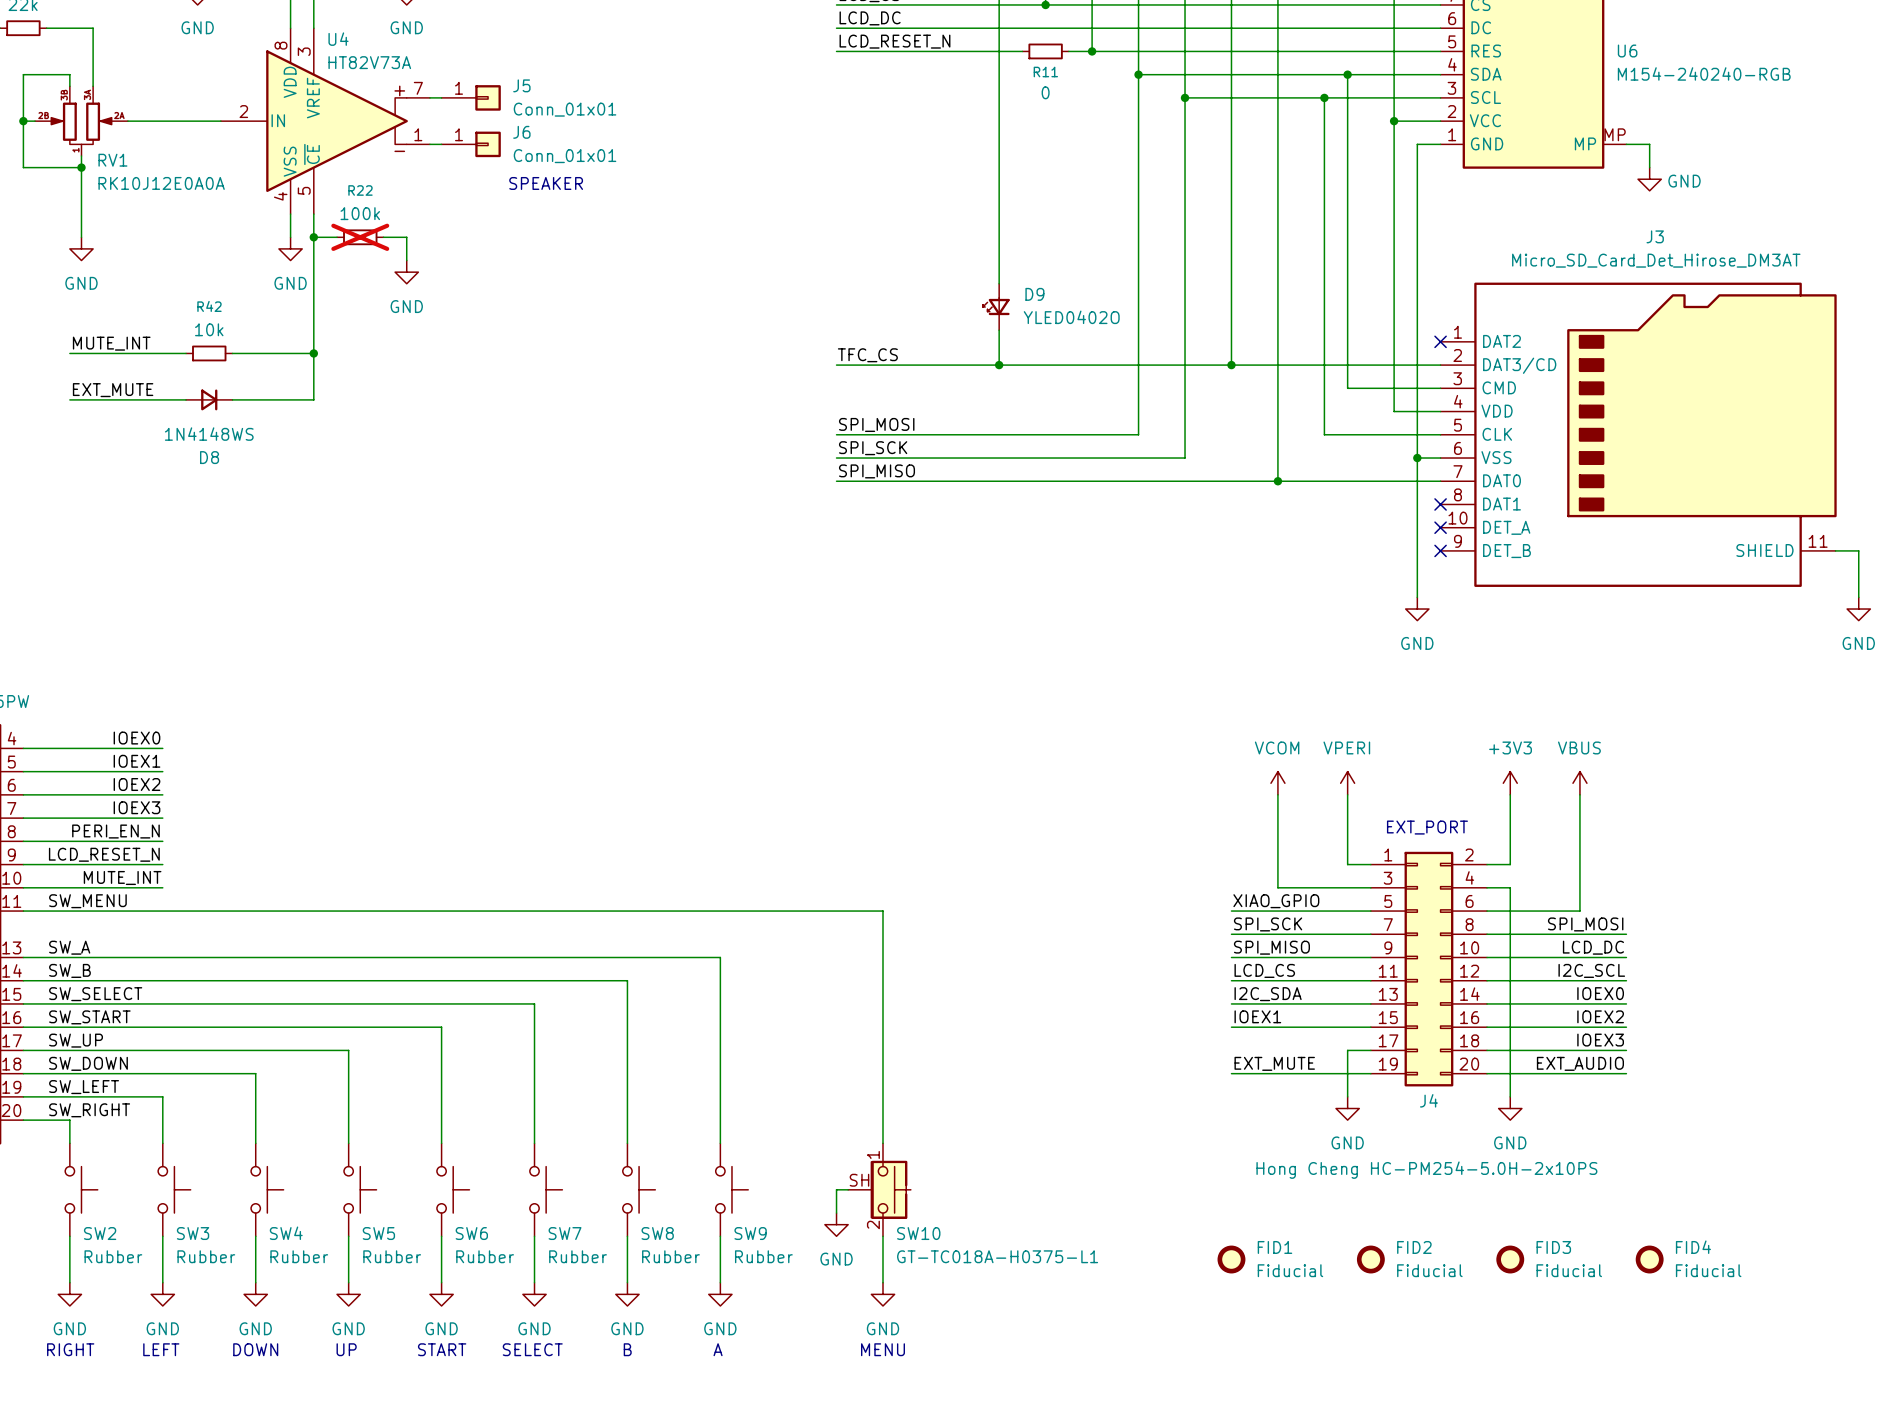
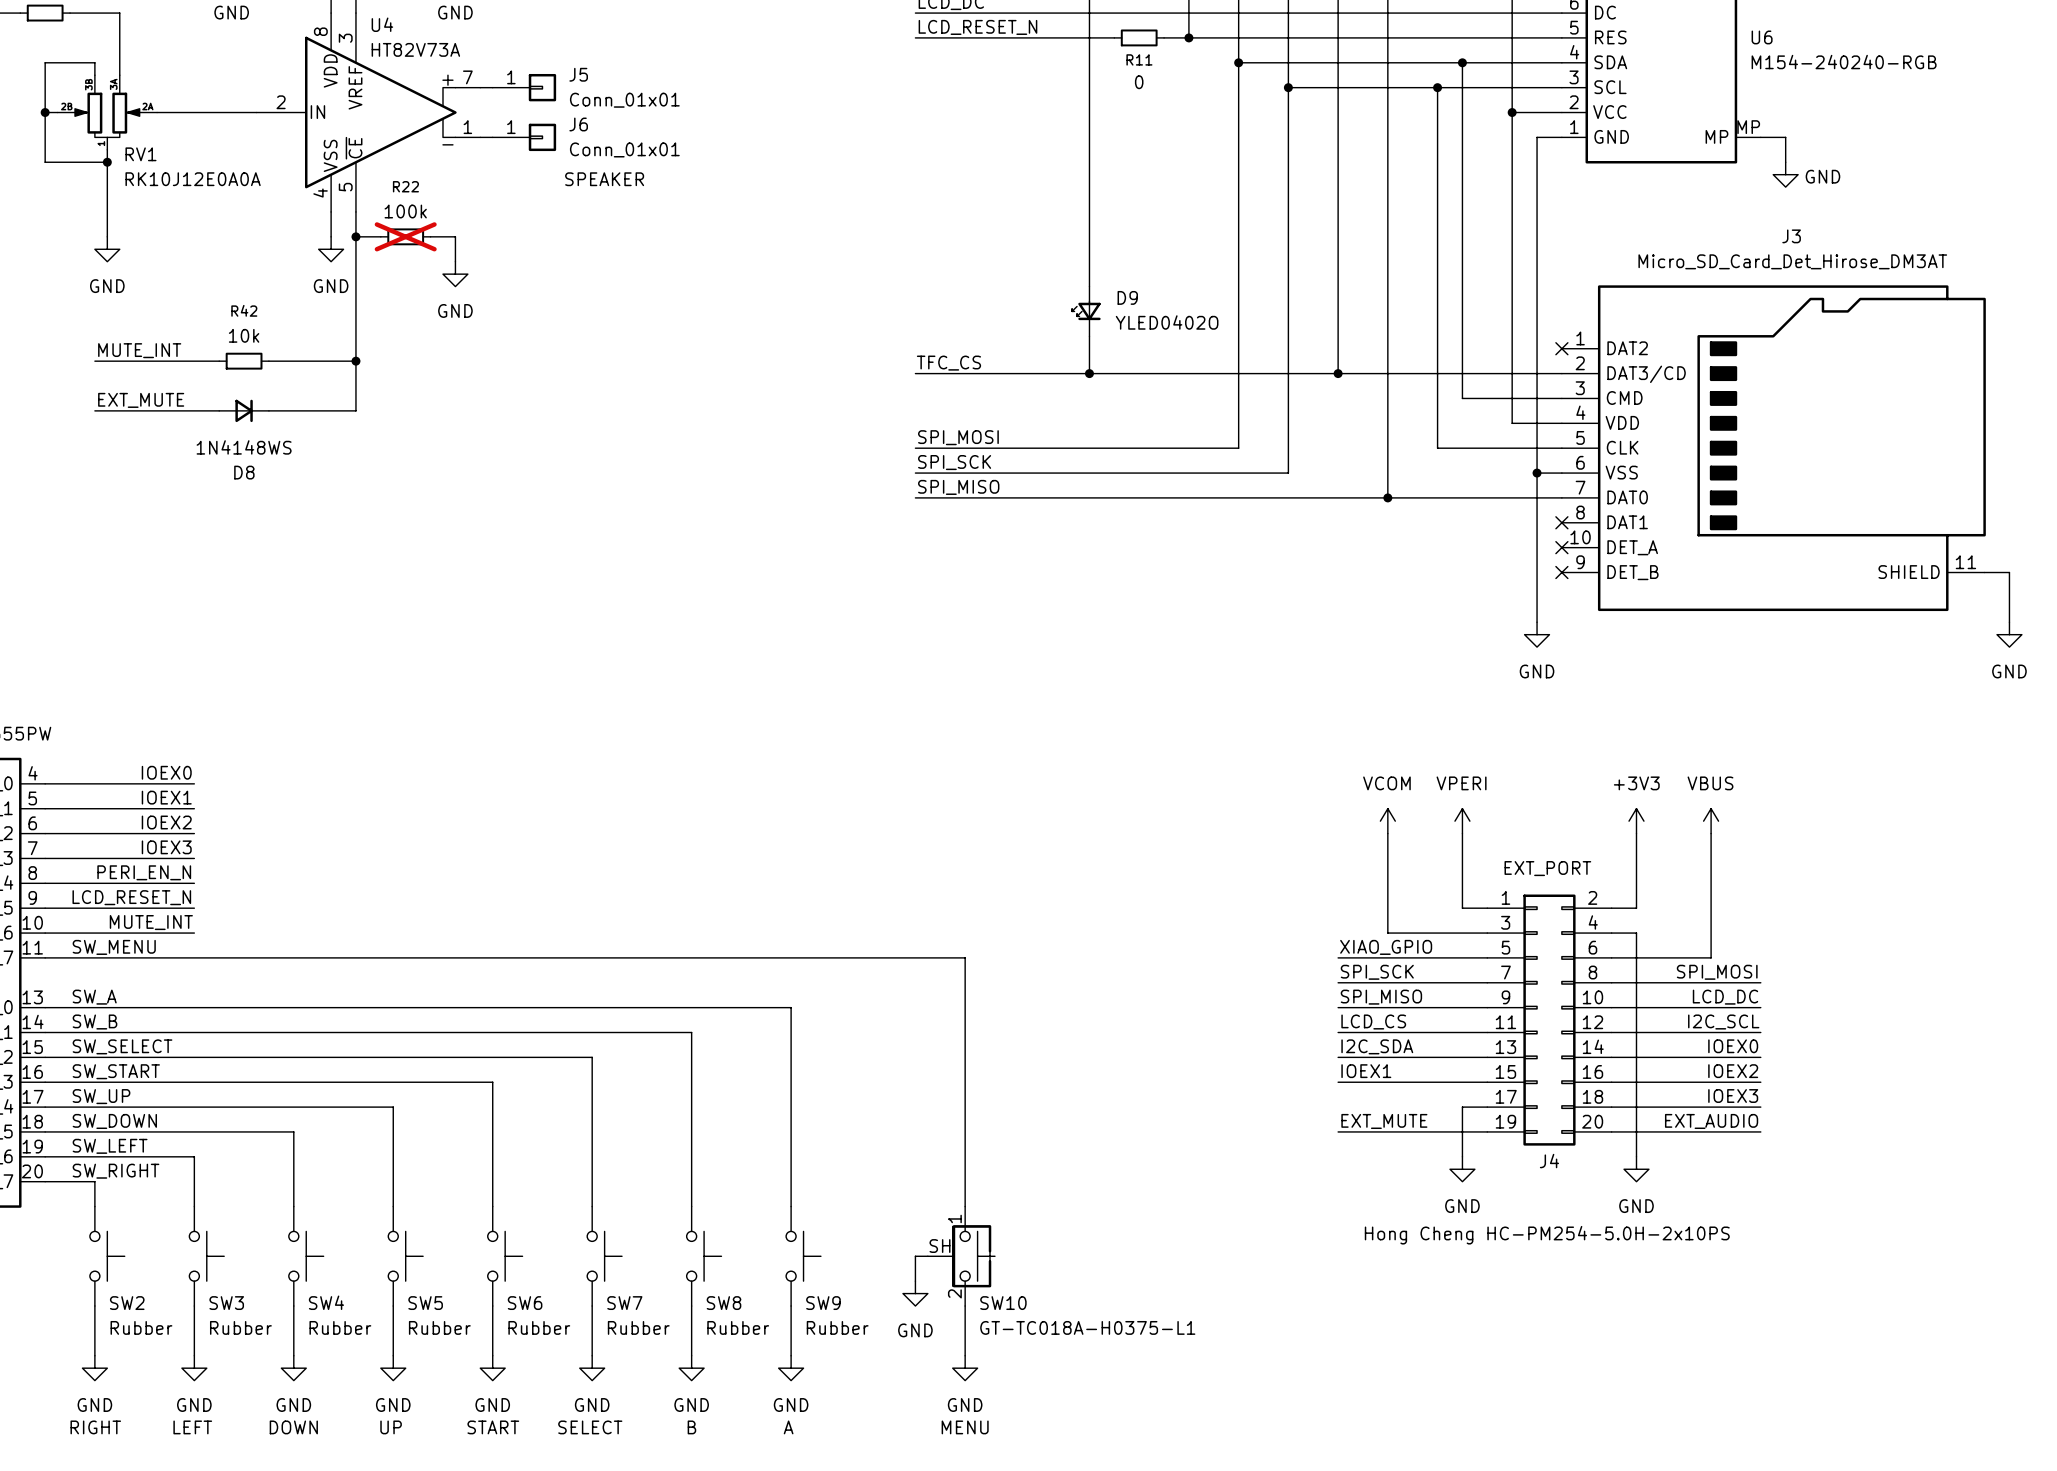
FID1: Fiducial (1231, 1259) -> none
FID2: Fiducial (1370, 1259) -> none
FID3: Fiducial (1510, 1259) -> none
FID4: Fiducial (1649, 1259) -> none

